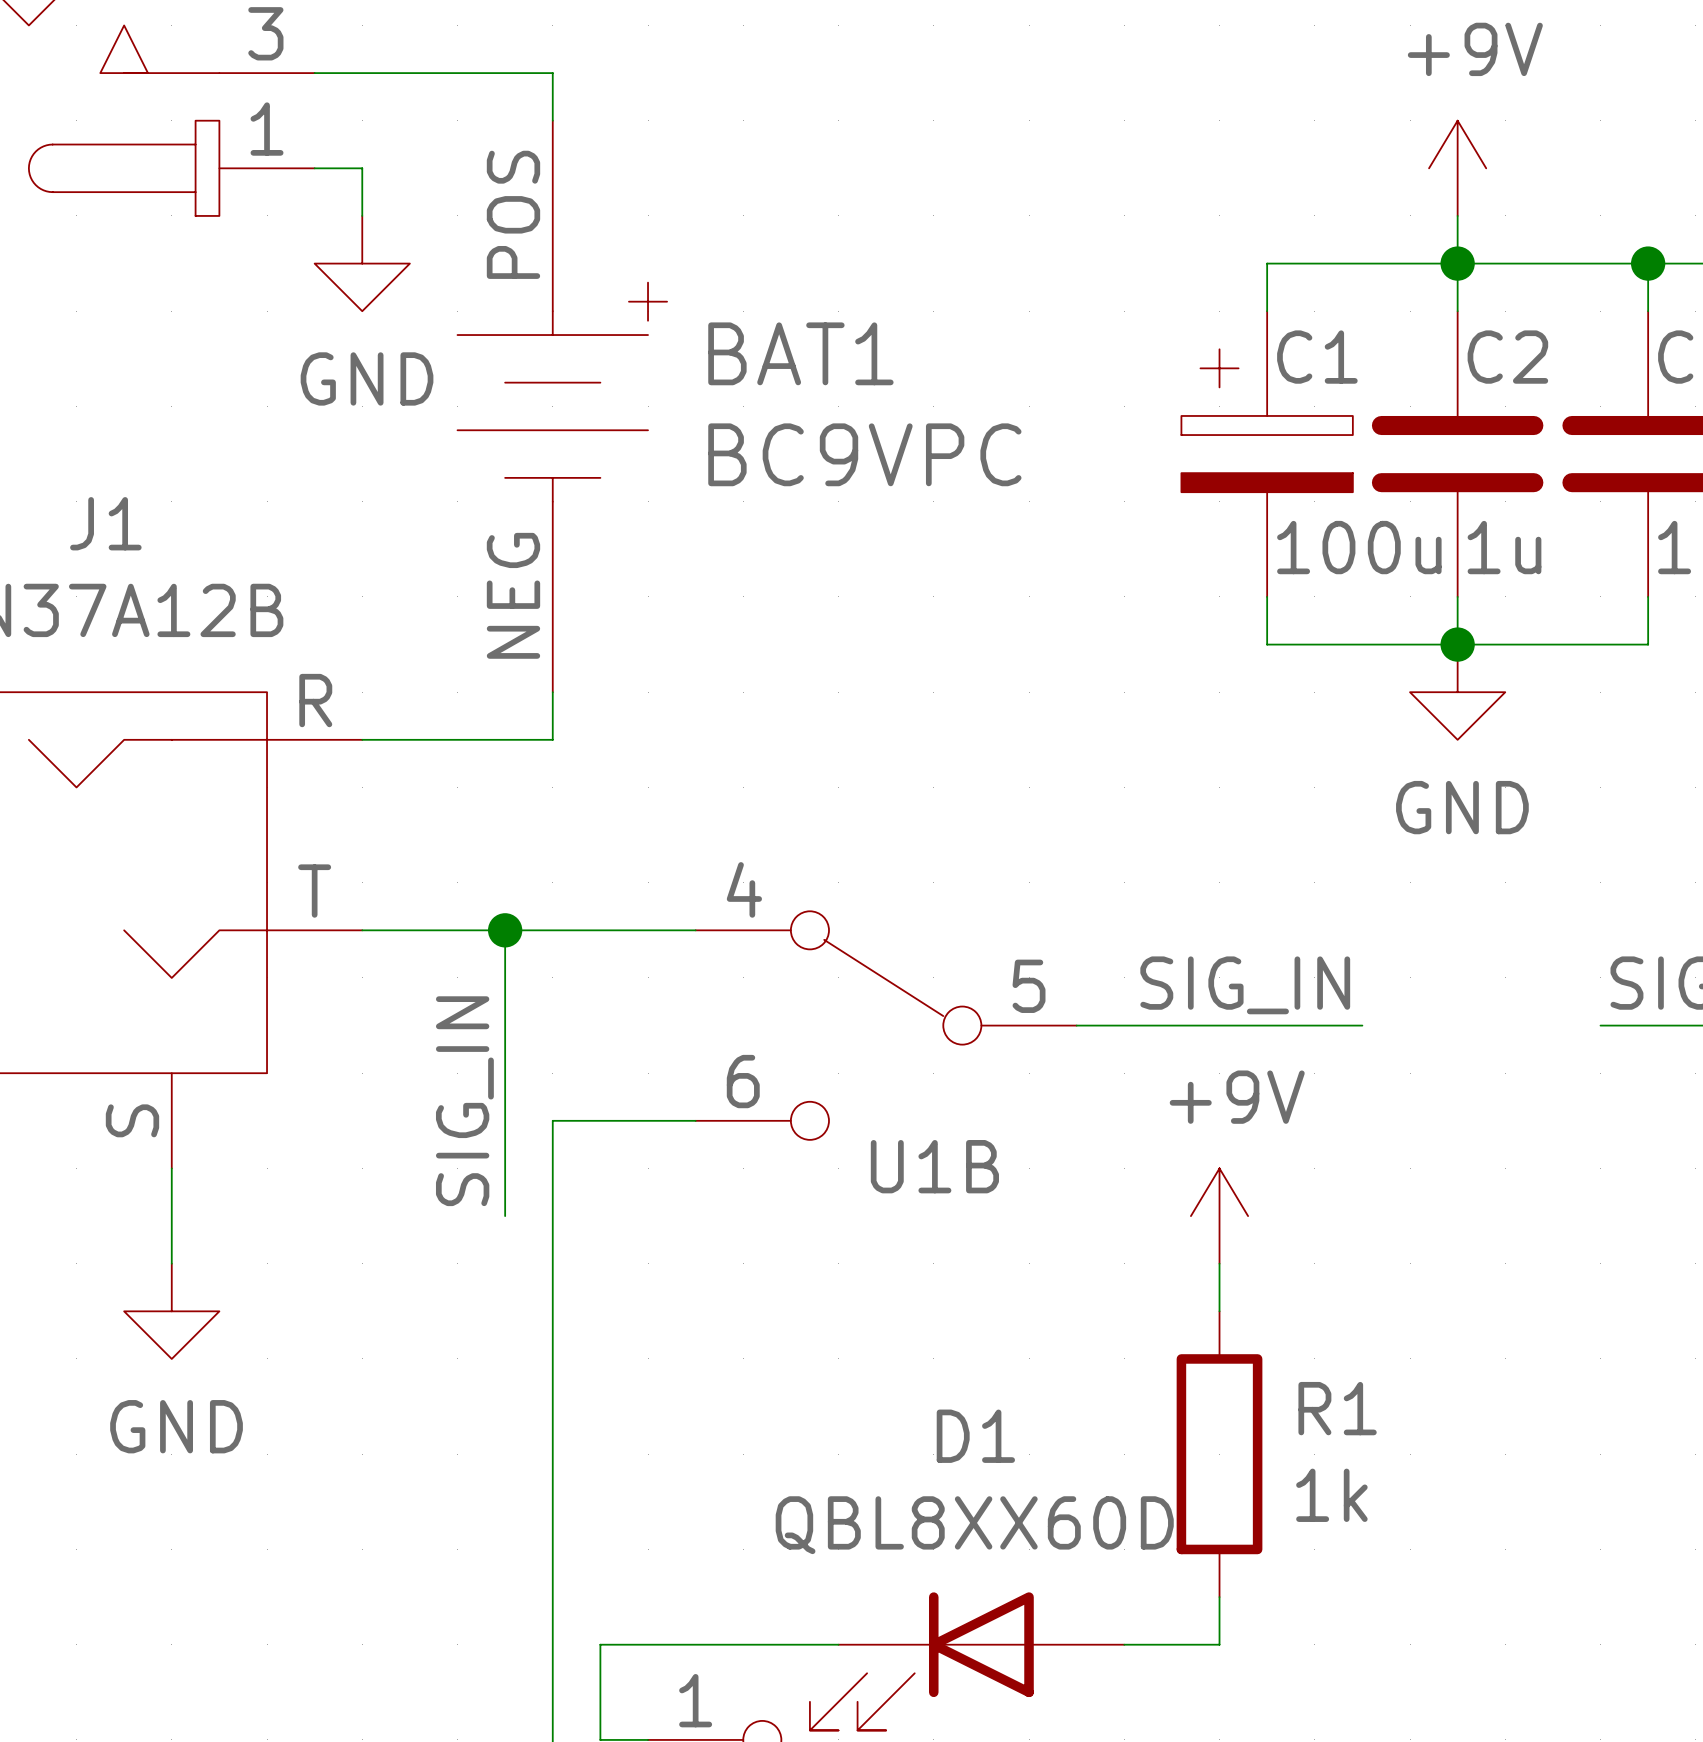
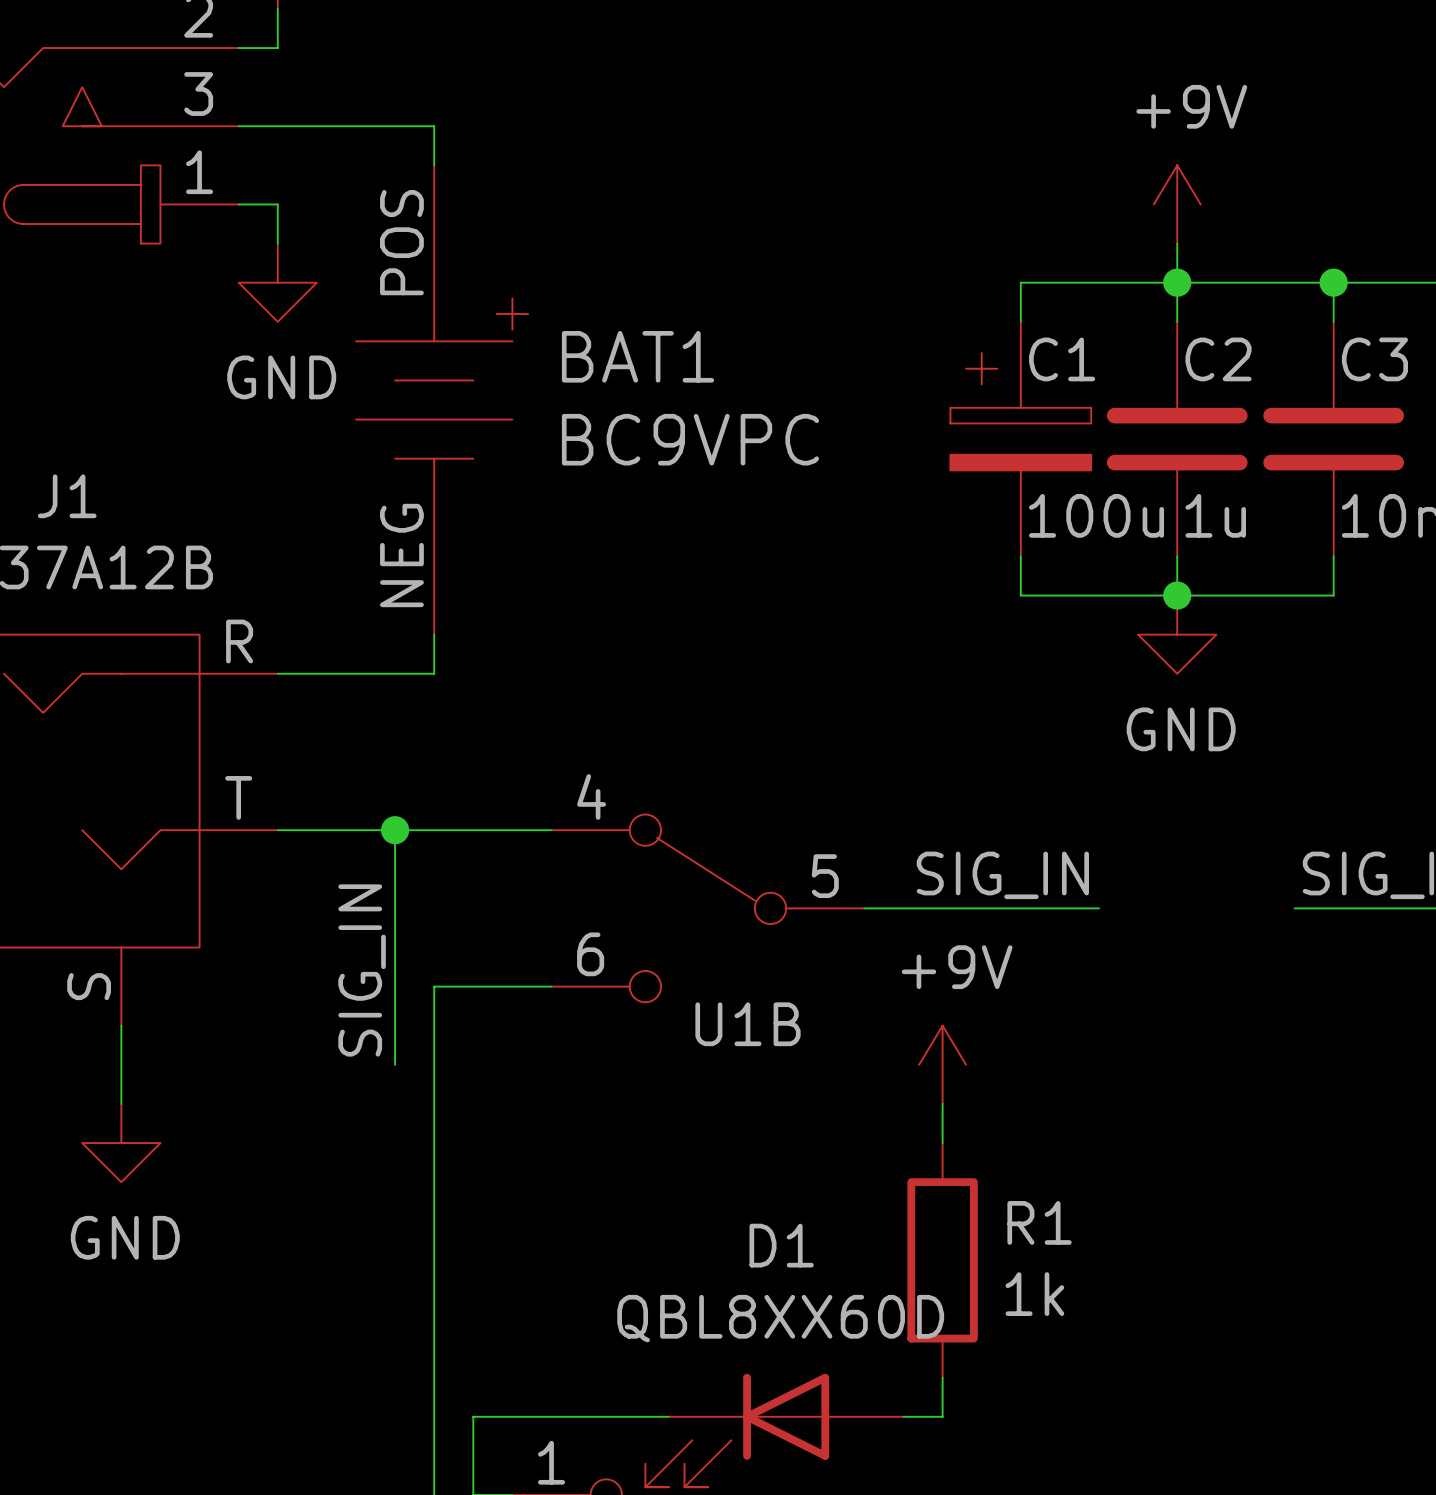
power symbol position: +9V (1219, 1216) -> +9V (942, 1064)
wire: (1219, 1263) (1219, 1311) -> (942, 1103) (942, 1143)
R1 position: (1219, 1454) -> (942, 1260)
wire: (1219, 1597) (1219, 1644) (1171, 1644) -> (942, 1377) (942, 1416)

